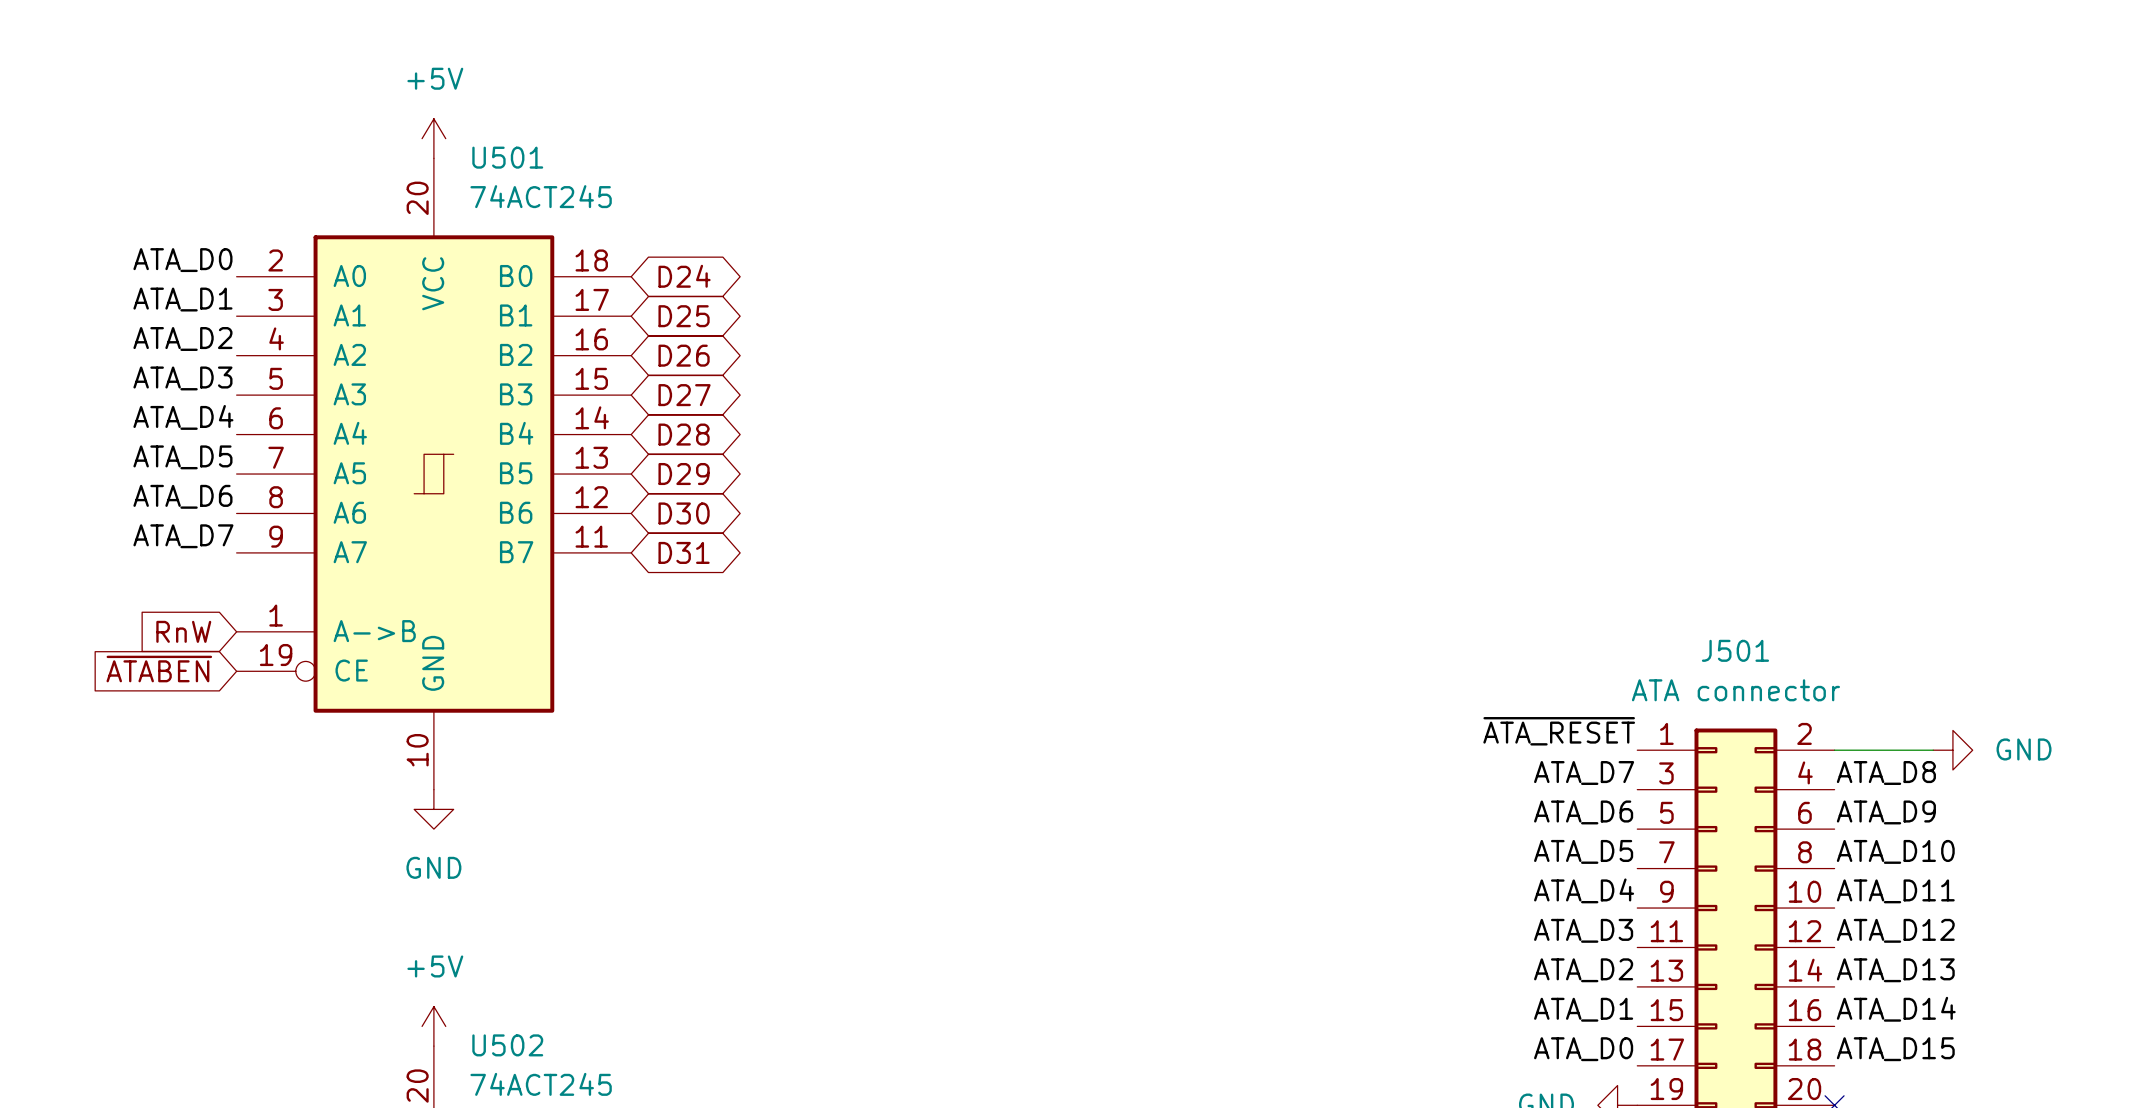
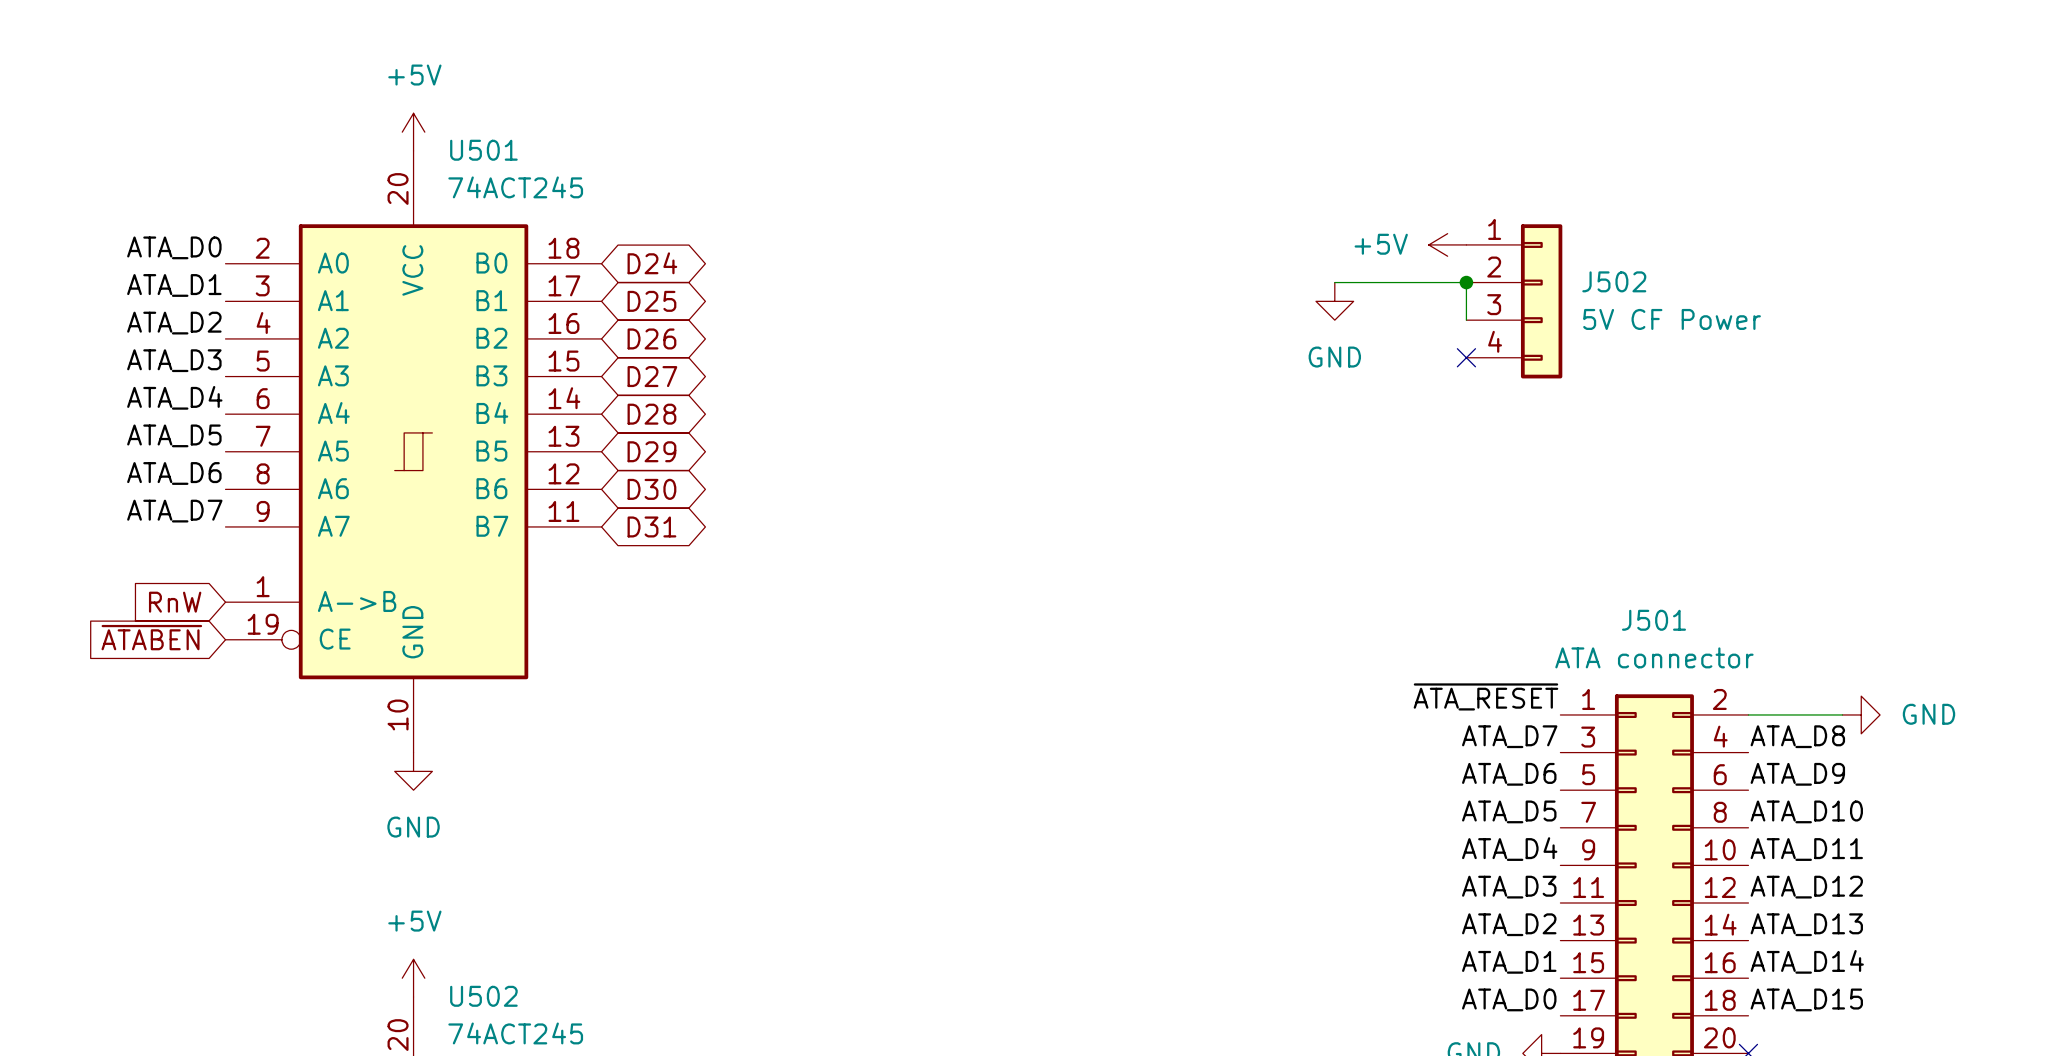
power symbol: none -> +5V (1447, 244)
wire: none -> (1334, 282) (1466, 282) (1466, 320)
junction: none -> (1466, 282)
power symbol: none -> GND (1334, 301)
J502: none -> 5V CF Power (1514, 301)
no-connect mark: none -> (1466, 357)

